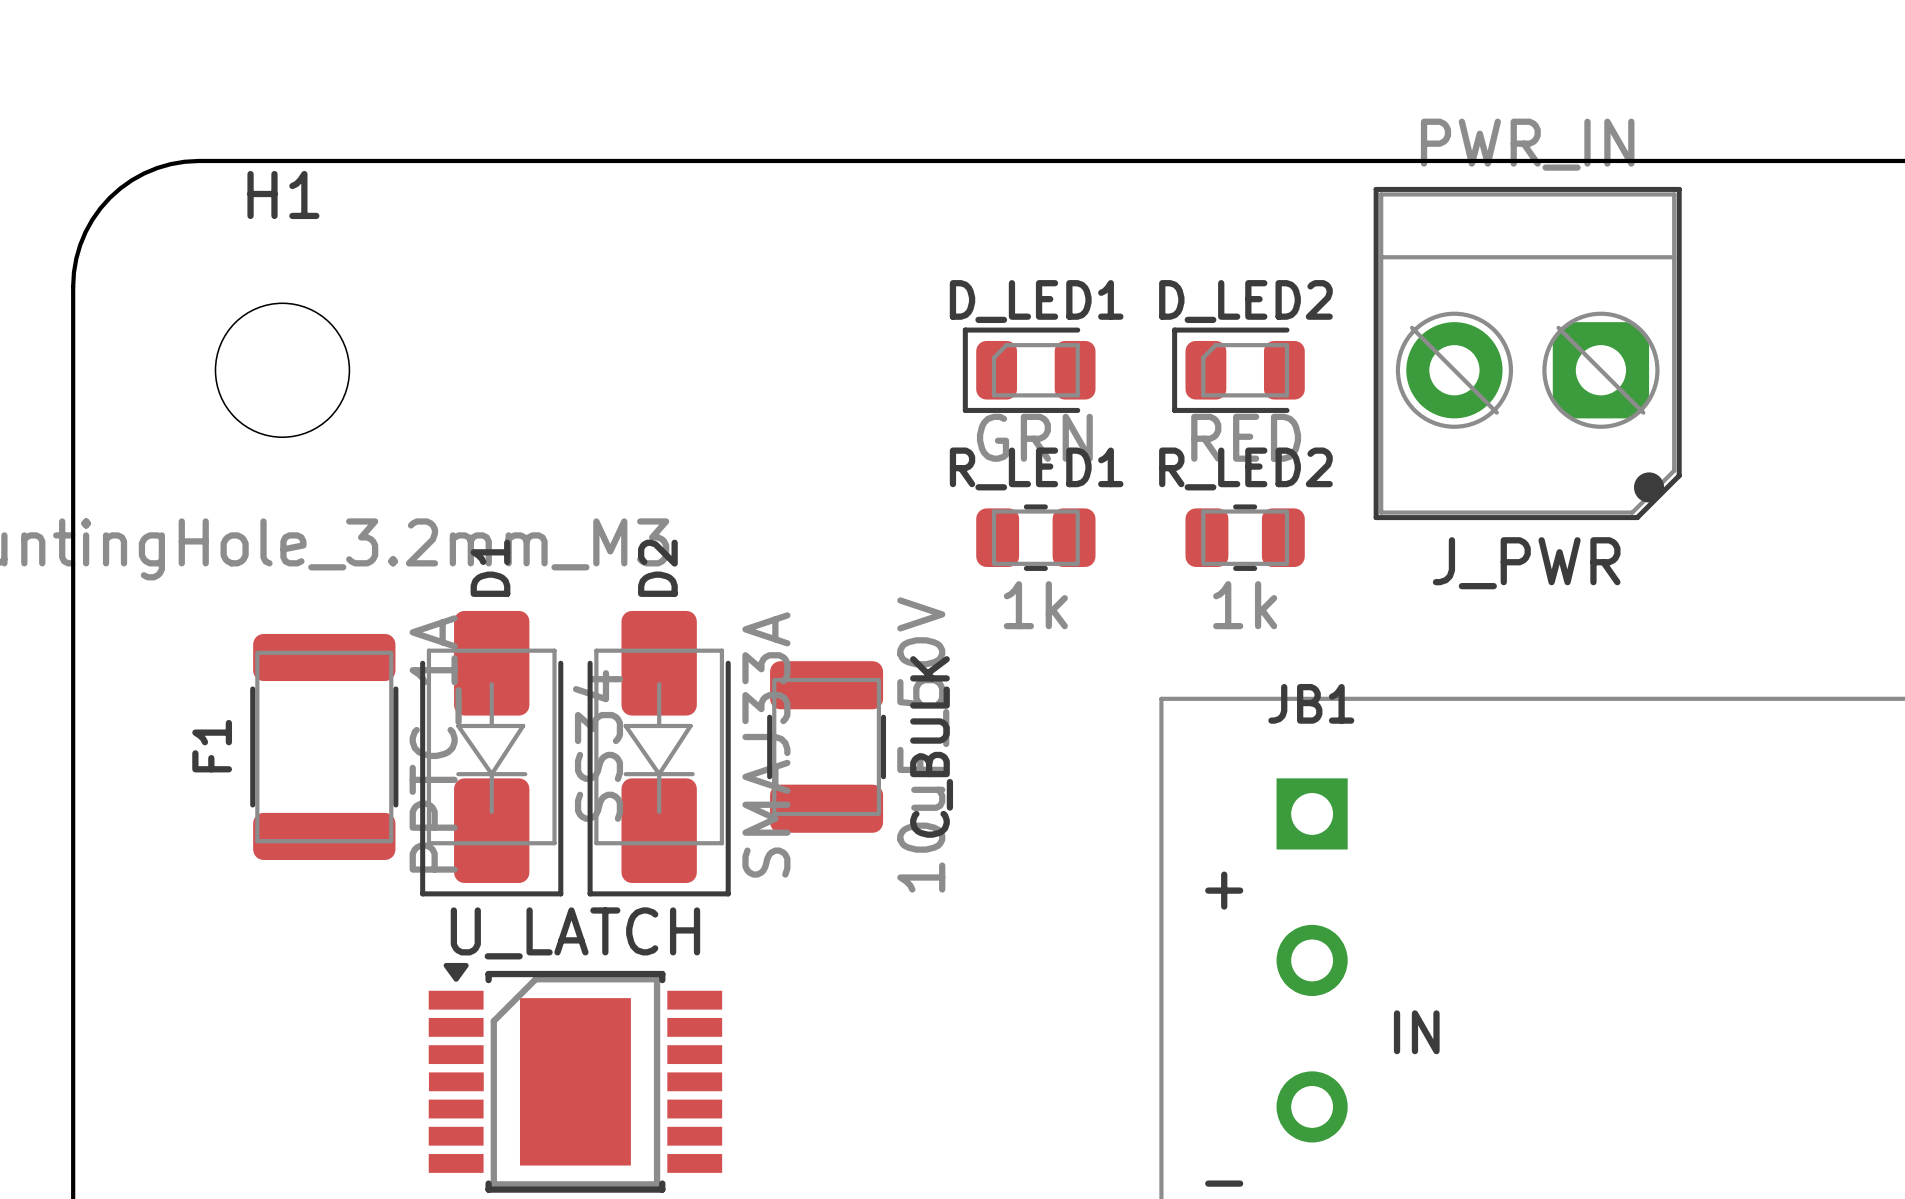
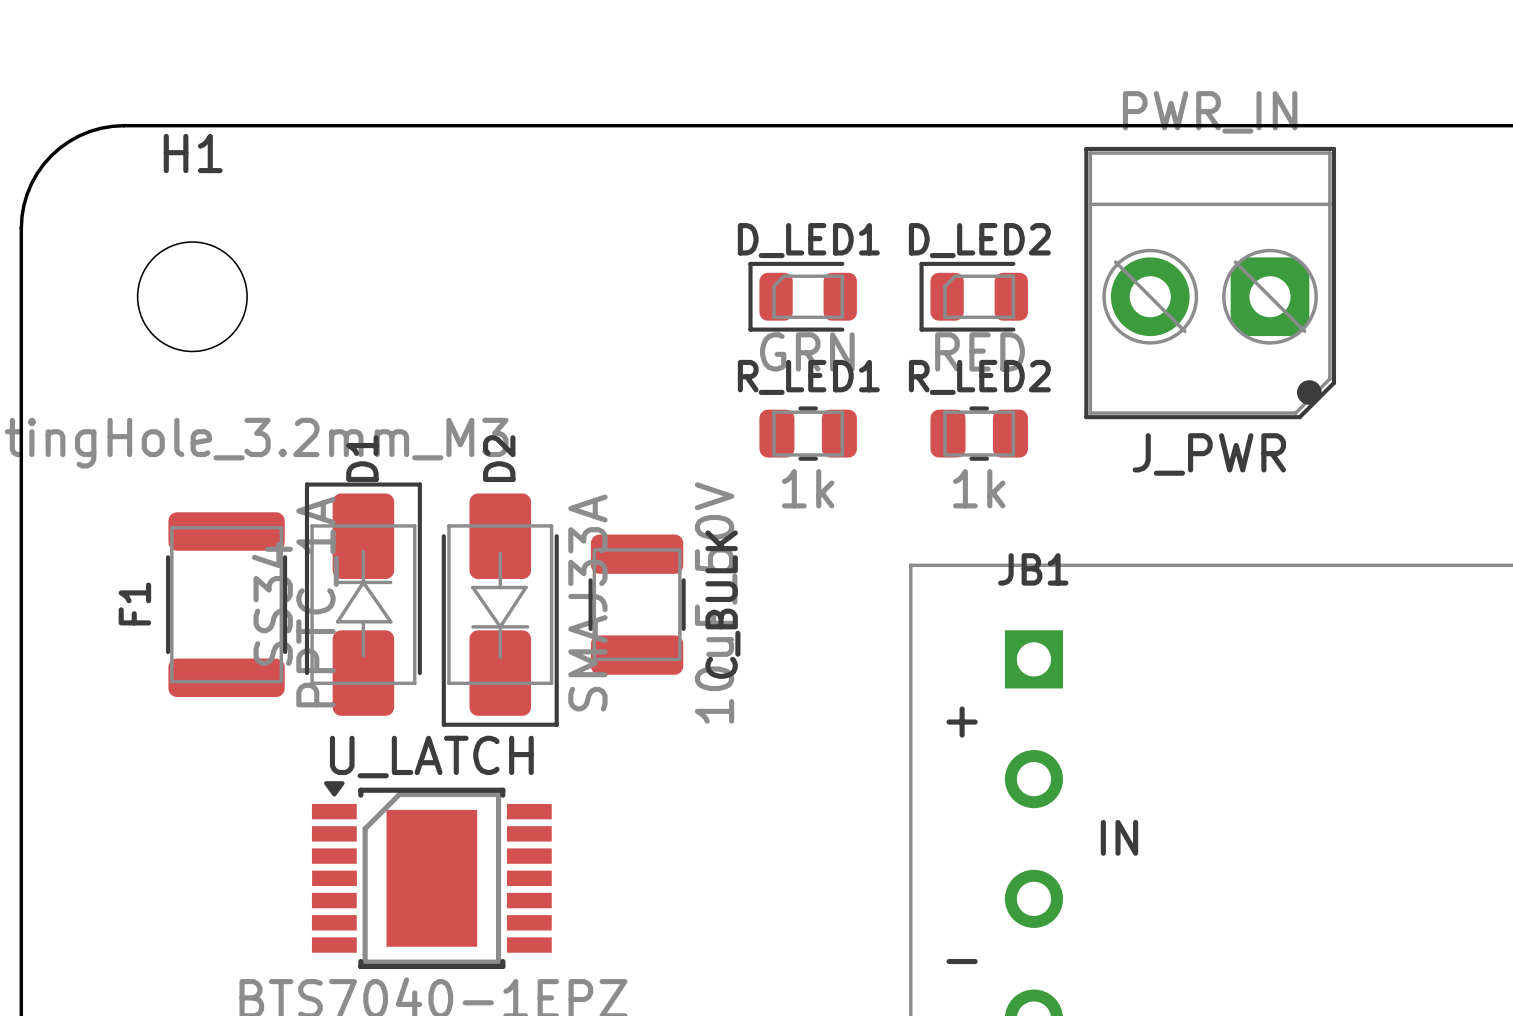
D1 rotation: 0° (491, 753) -> 180° (363, 599)

